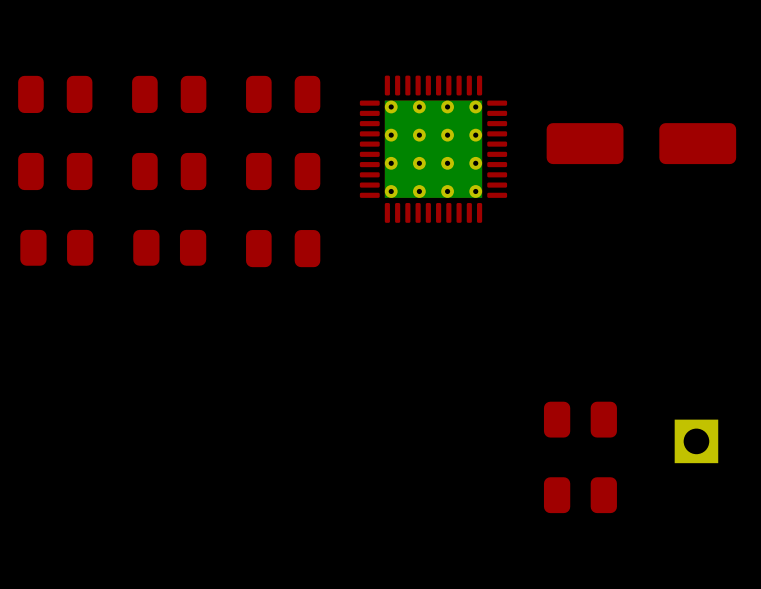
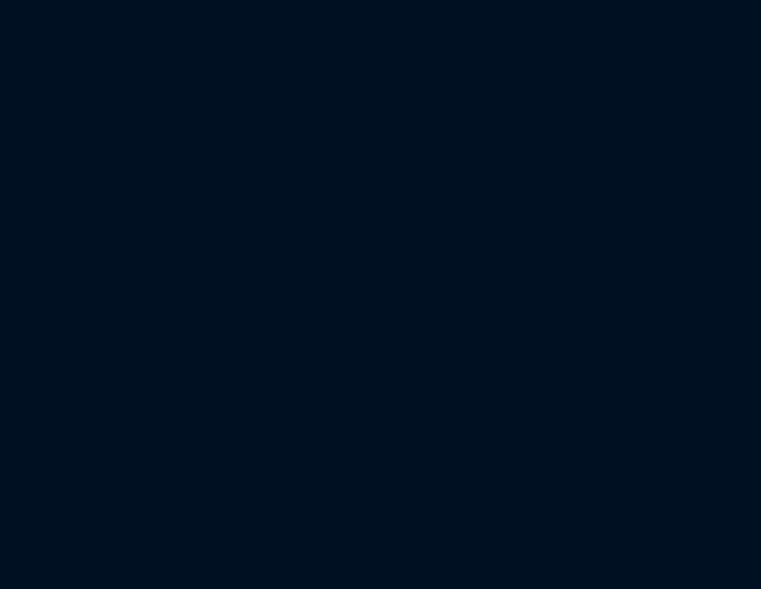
part: (55, 94) -> none
part: (169, 94) -> none
part: (283, 94) -> none
part: (641, 143) -> none
part: (433, 149) -> none
part: (55, 171) -> none
part: (169, 171) -> none
part: (283, 171) -> none
part: (56, 247) -> none
part: (169, 247) -> none
part: (283, 248) -> none
part: (580, 419) -> none
part: (696, 441) -> none
part: (580, 495) -> none

